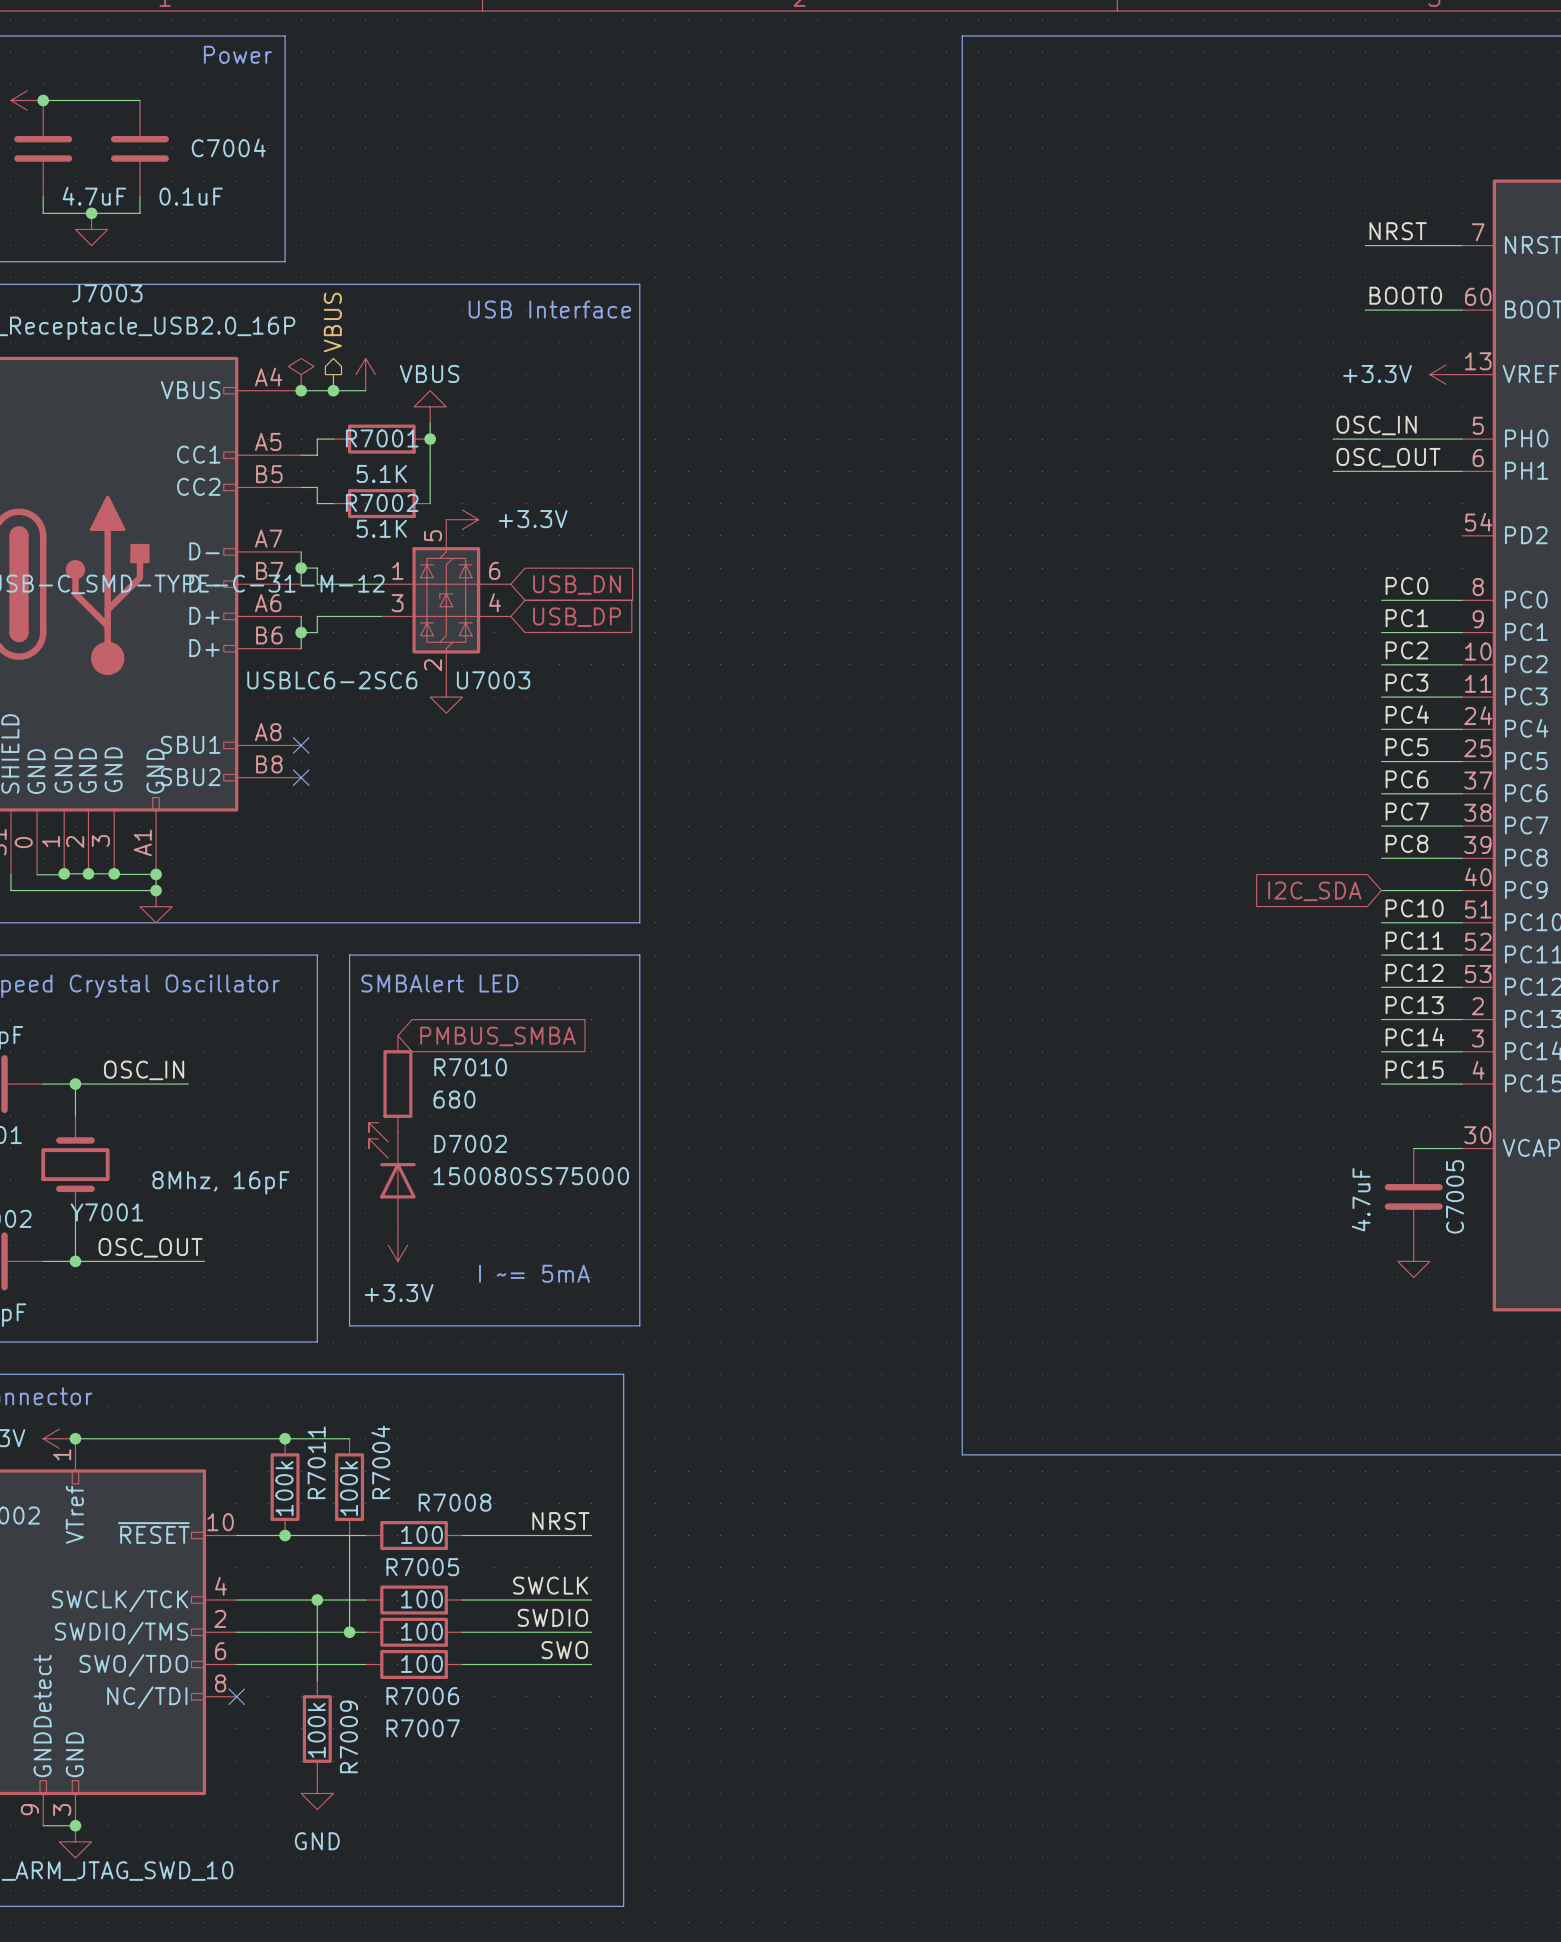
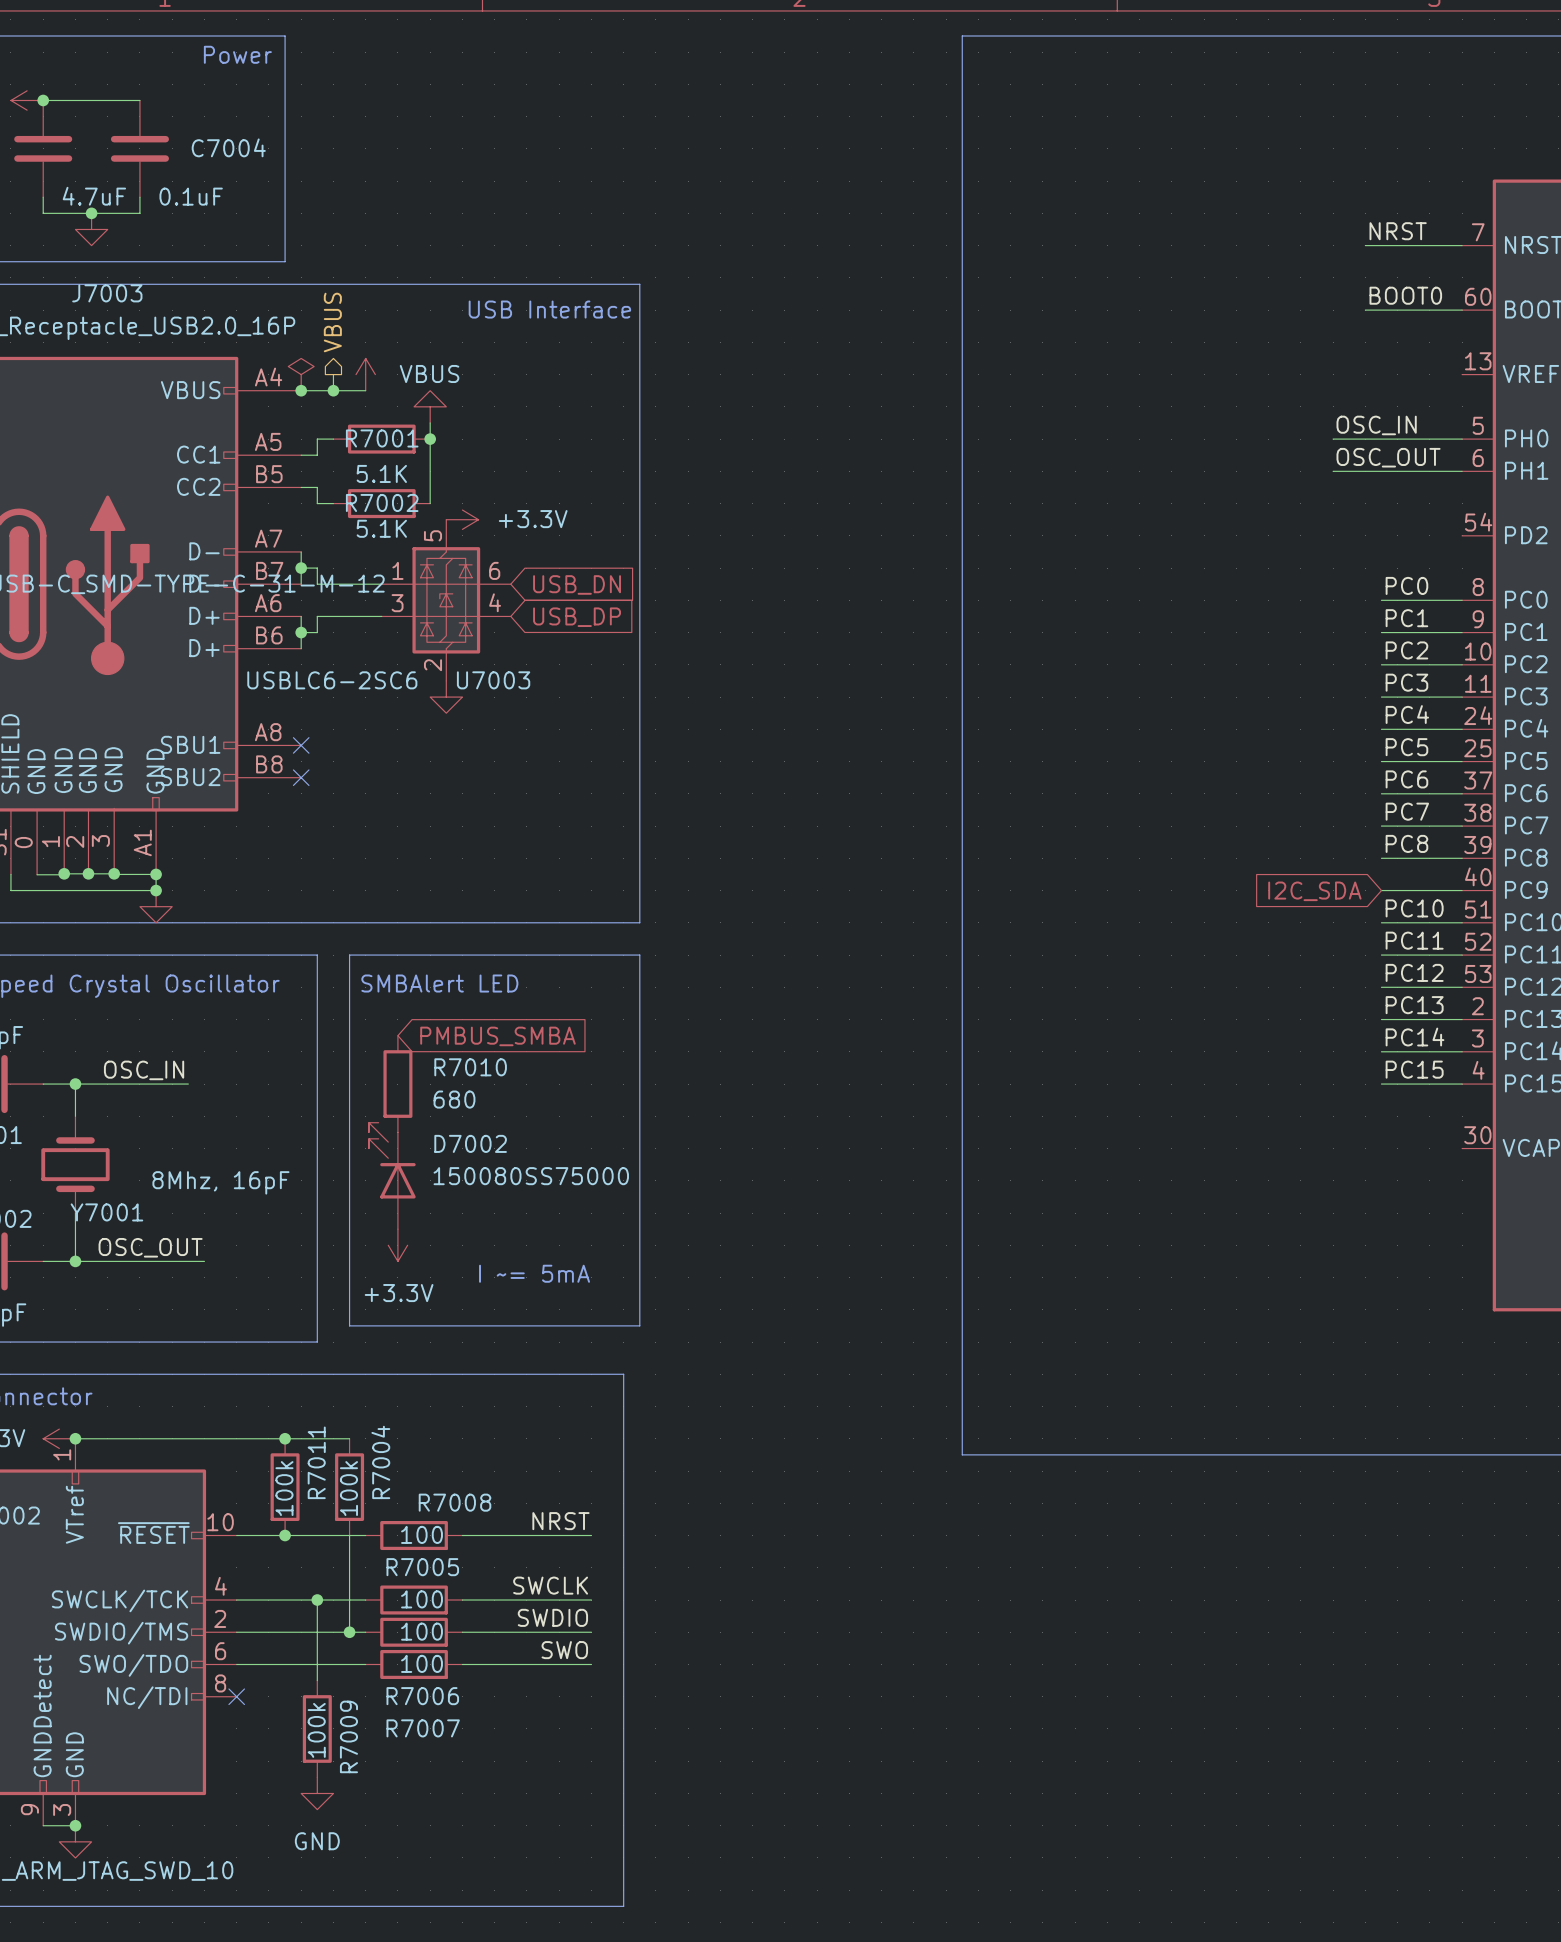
power symbol: +3.3V (1445, 374) -> none
wire: (1413, 1148) (1462, 1148) -> none
C7005: 4.7uF (1413, 1196) -> none
power symbol: (1413, 1261) -> none

